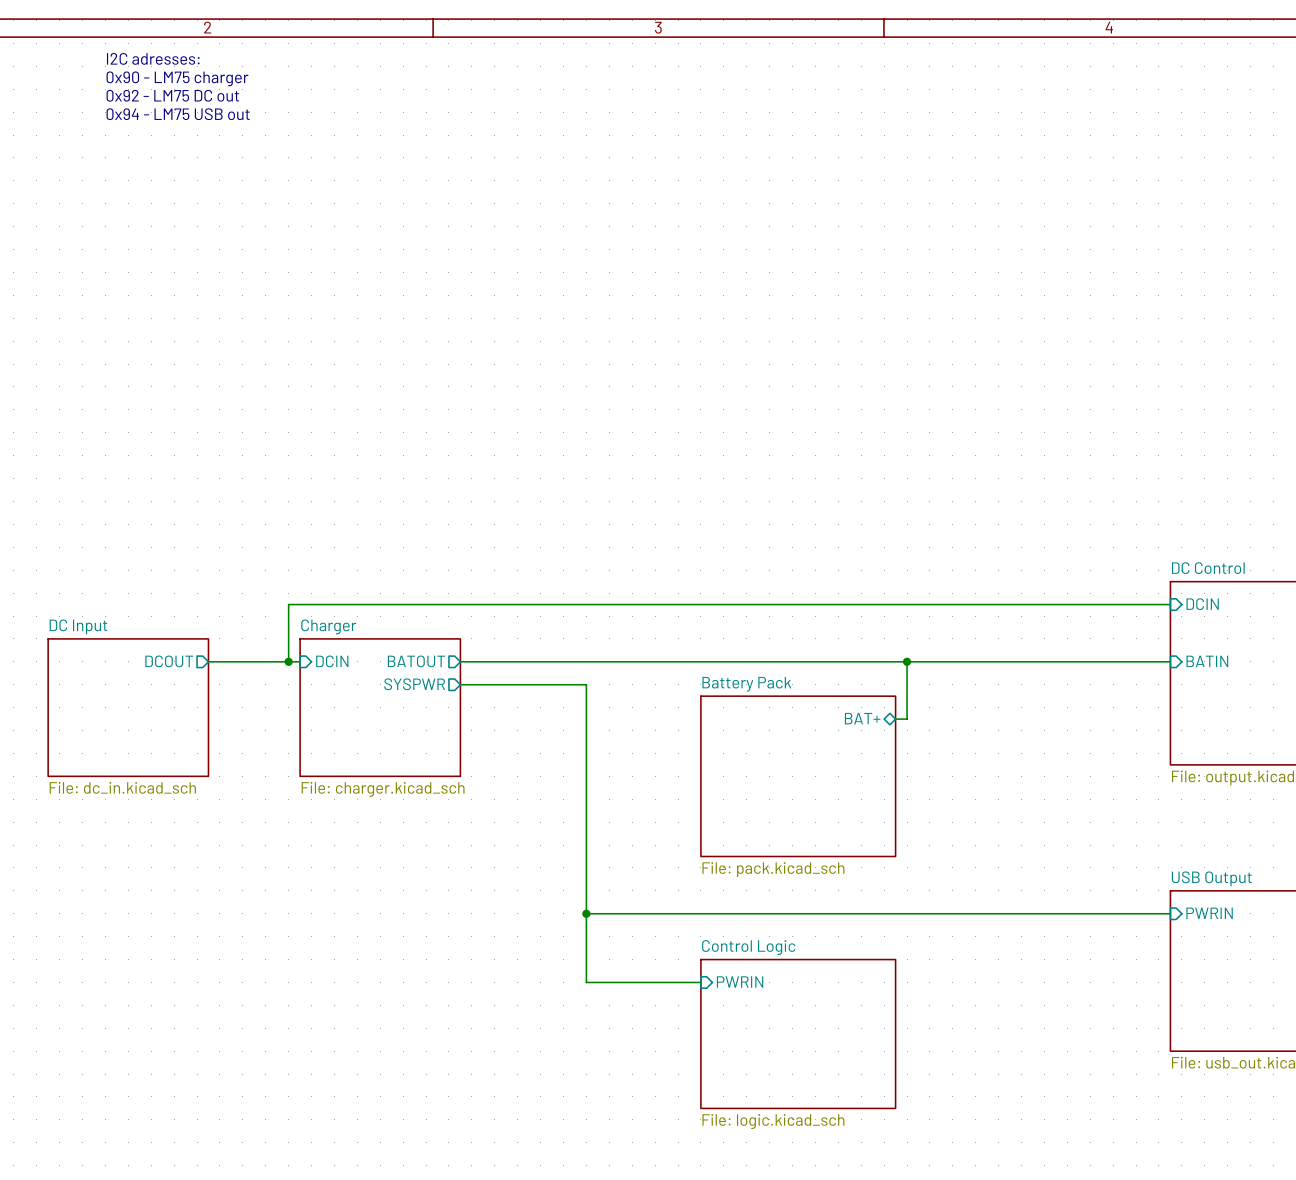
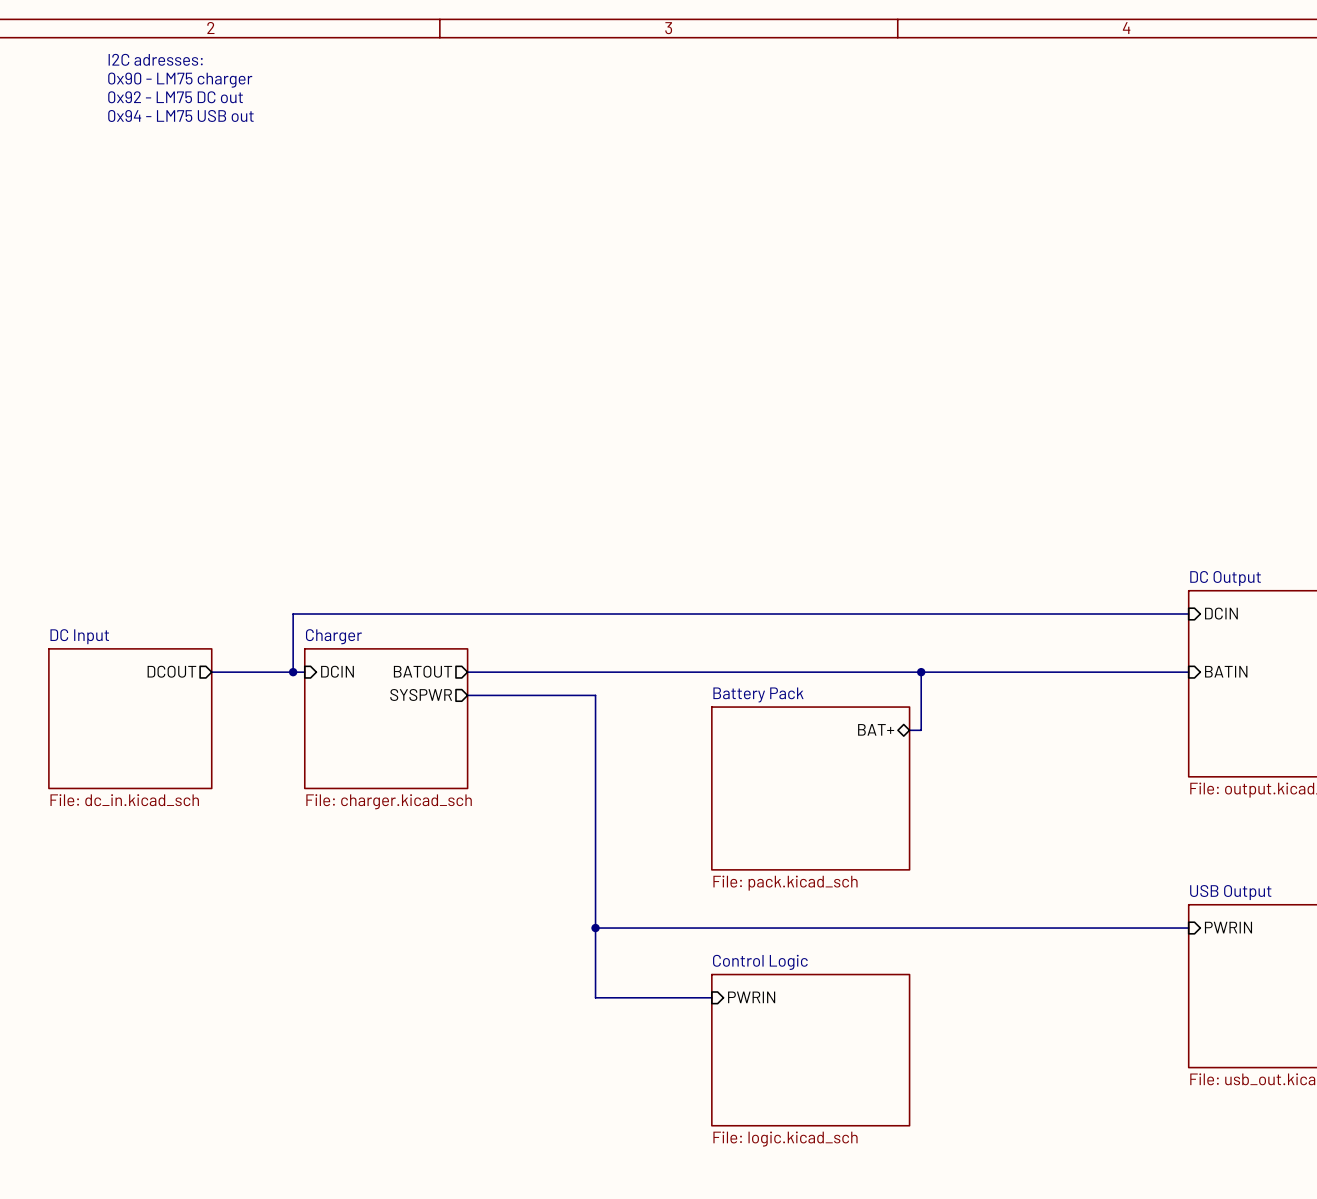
sheet DC Control name: DC Control (1208, 568) -> DC Output (1225, 578)

